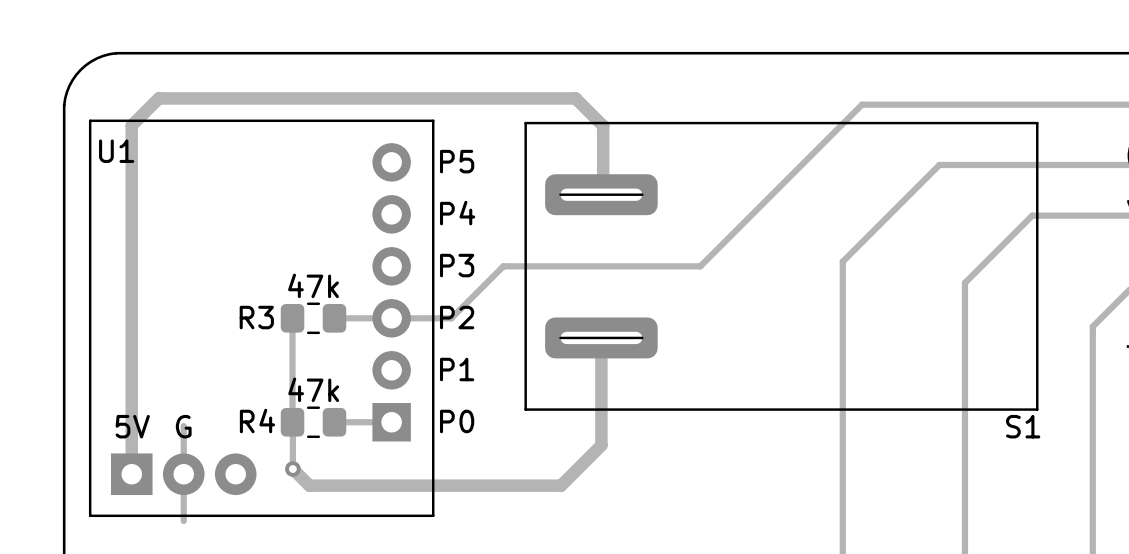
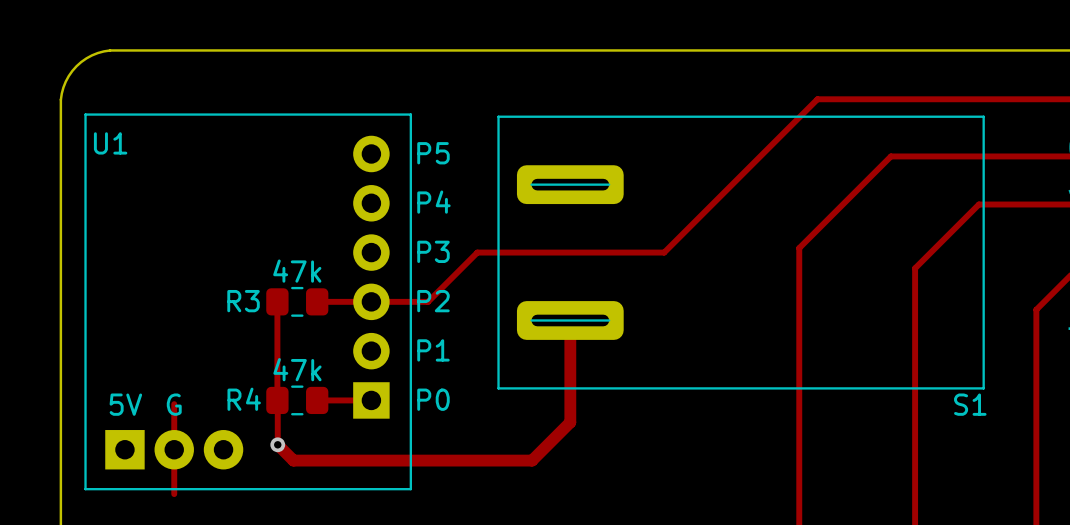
track: (603, 193) (603, 125) (575, 98) (158, 98) (131, 125) (131, 474) -> none

